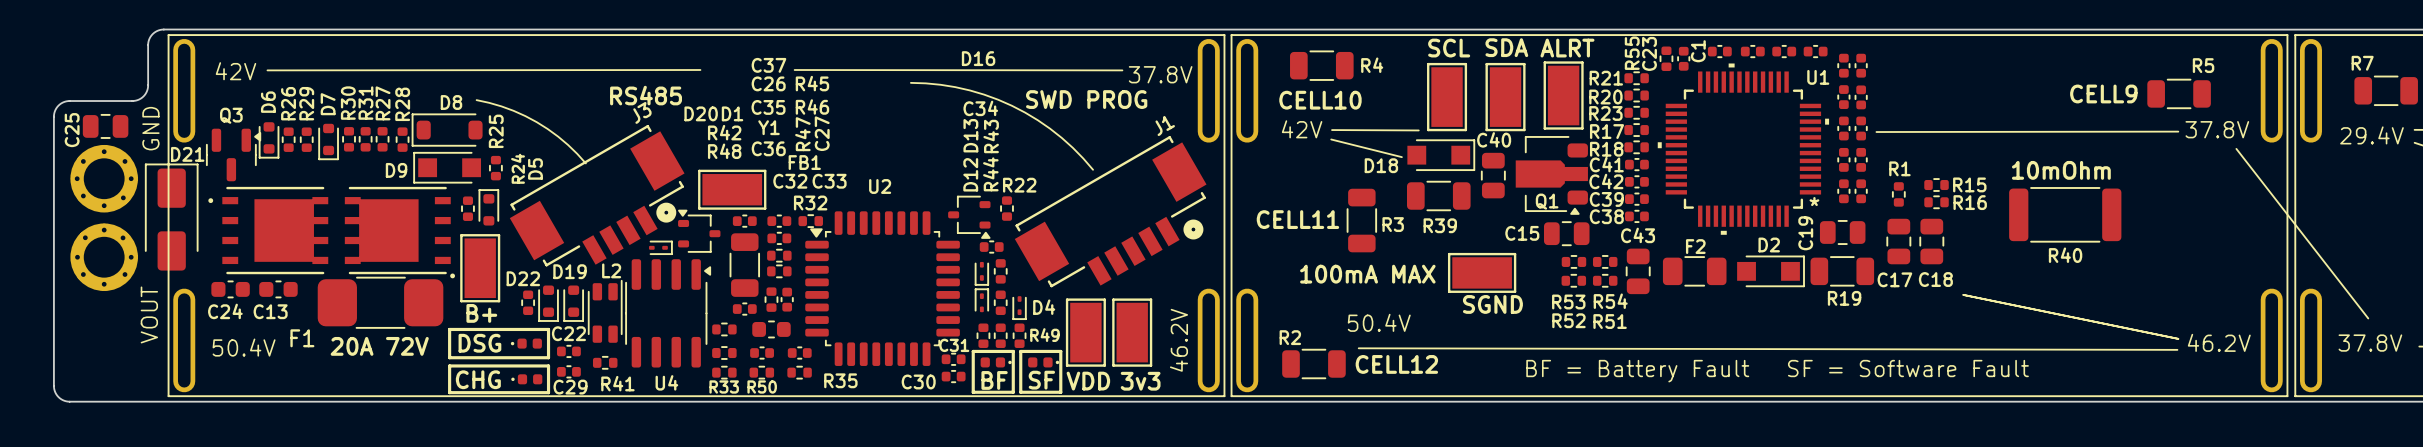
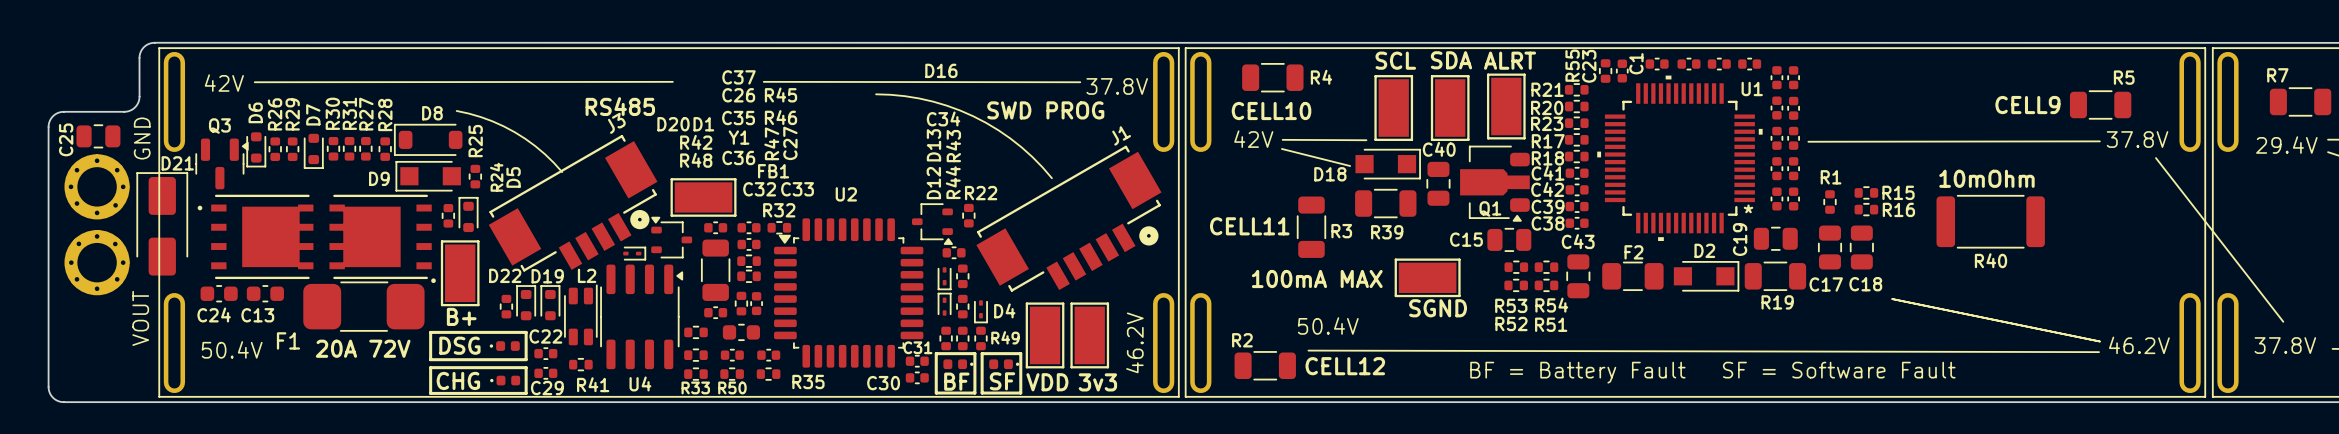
D22 rotation: 0° (548, 303) -> 180° (526, 302)
D19 rotation: 0° (573, 303) -> 180° (550, 302)

